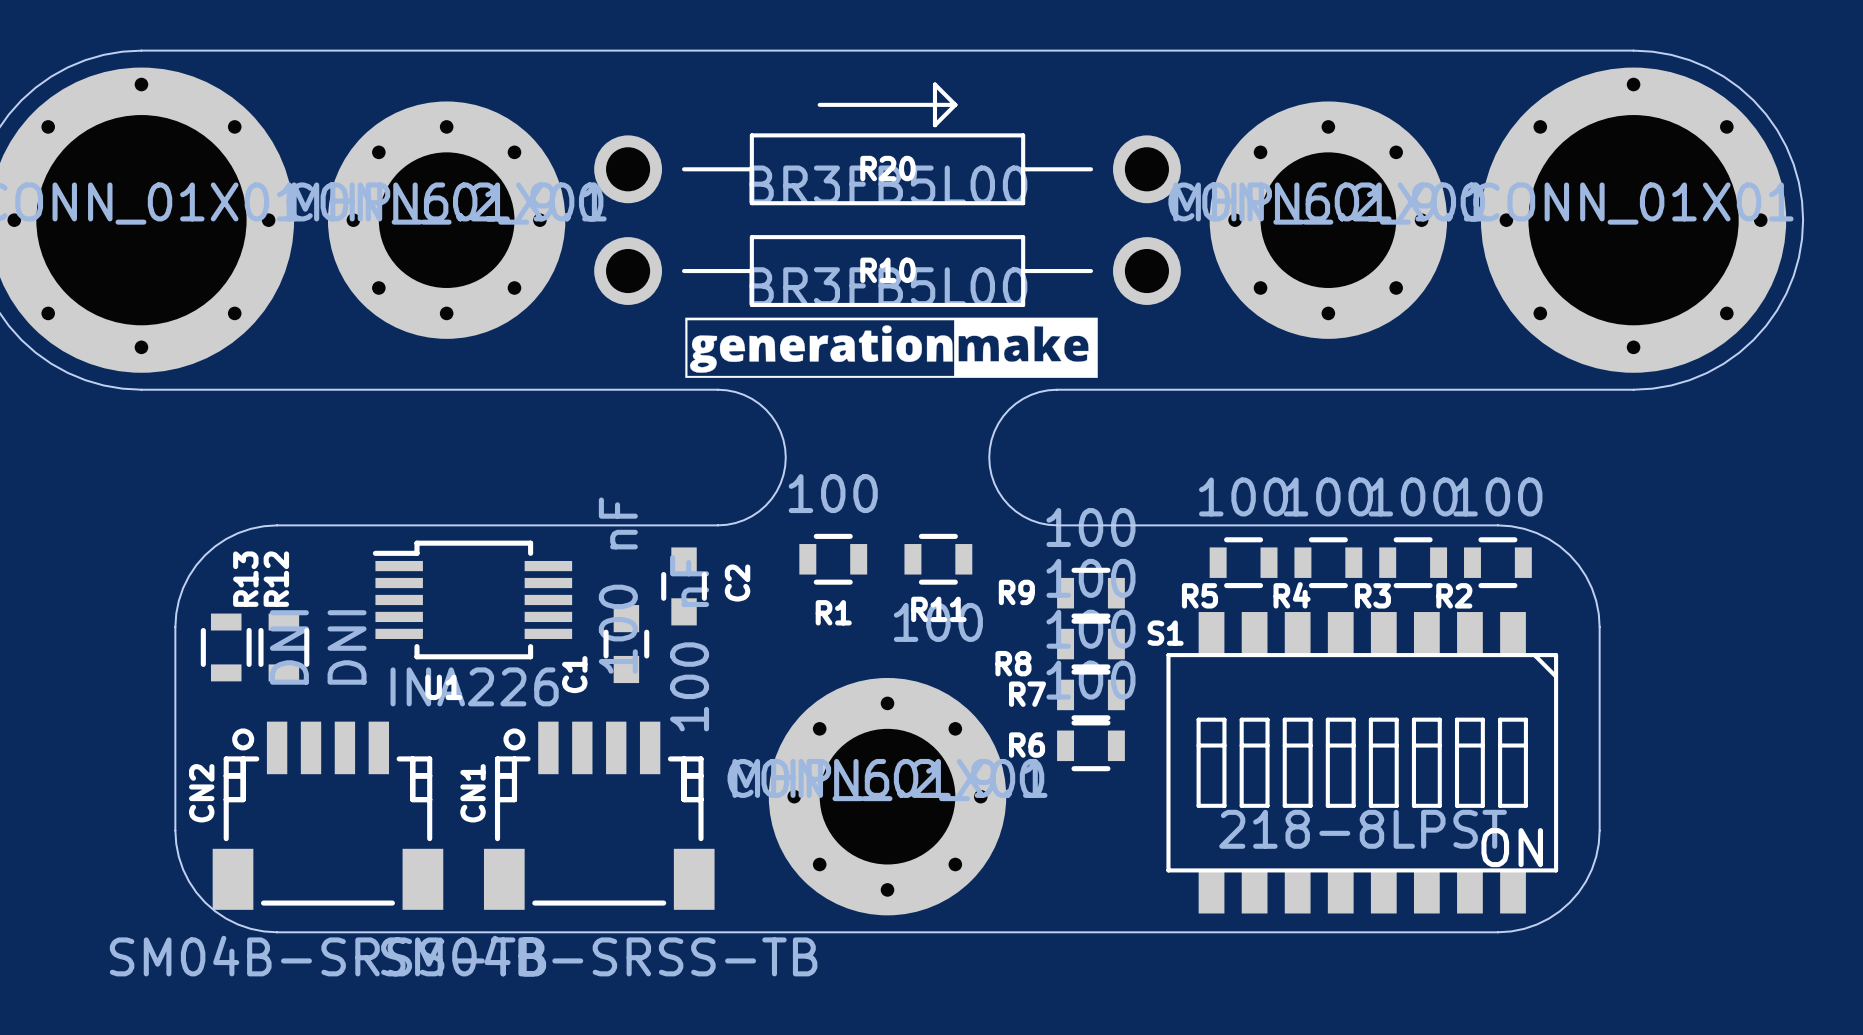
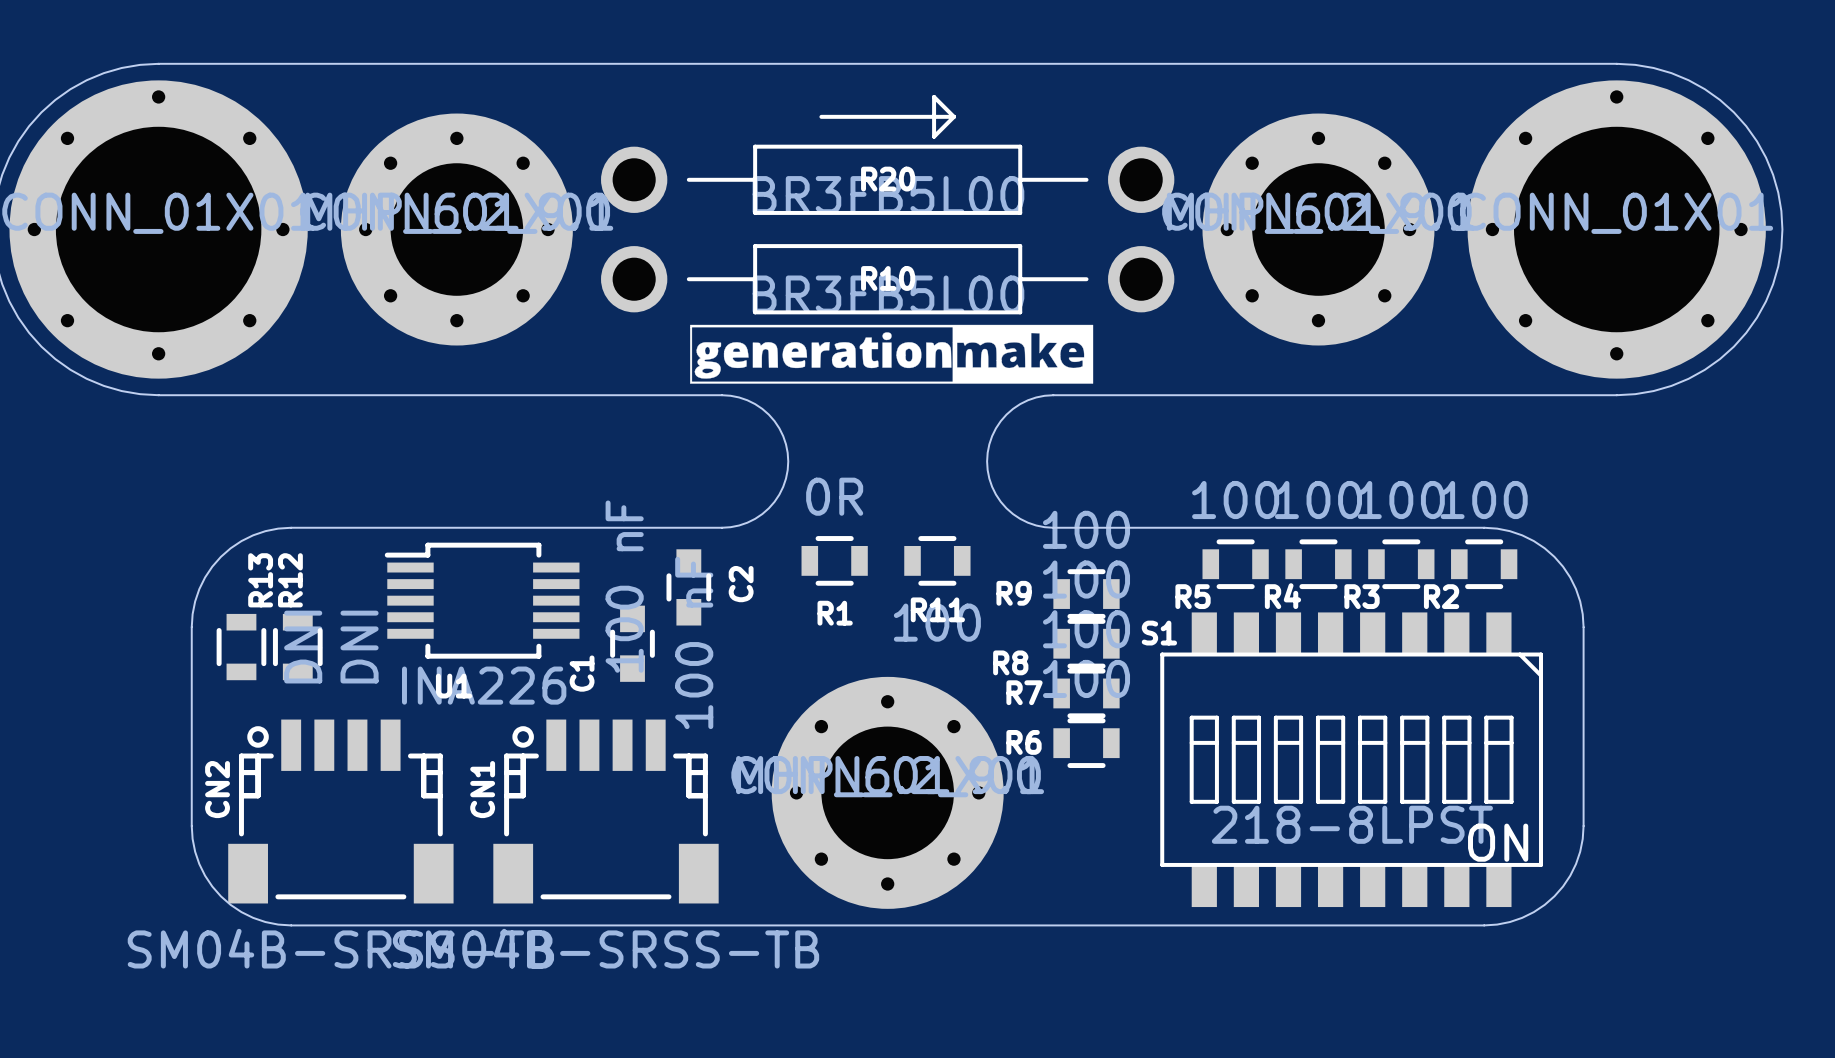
R1 value: 100 (833, 493) -> 0R (834, 496)

